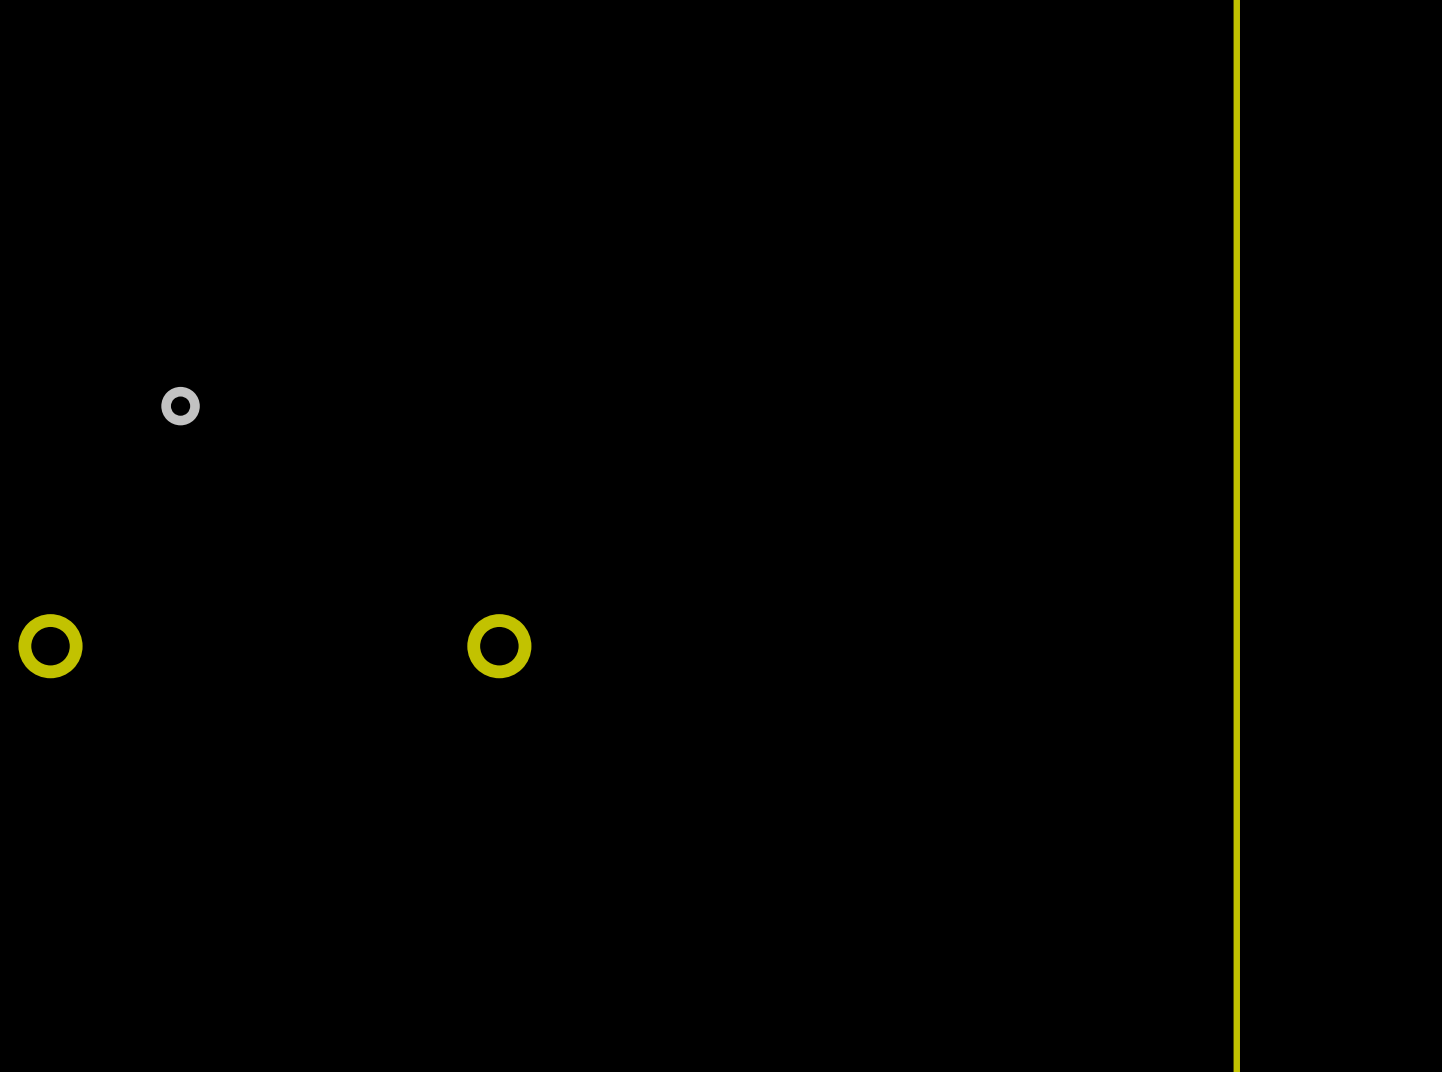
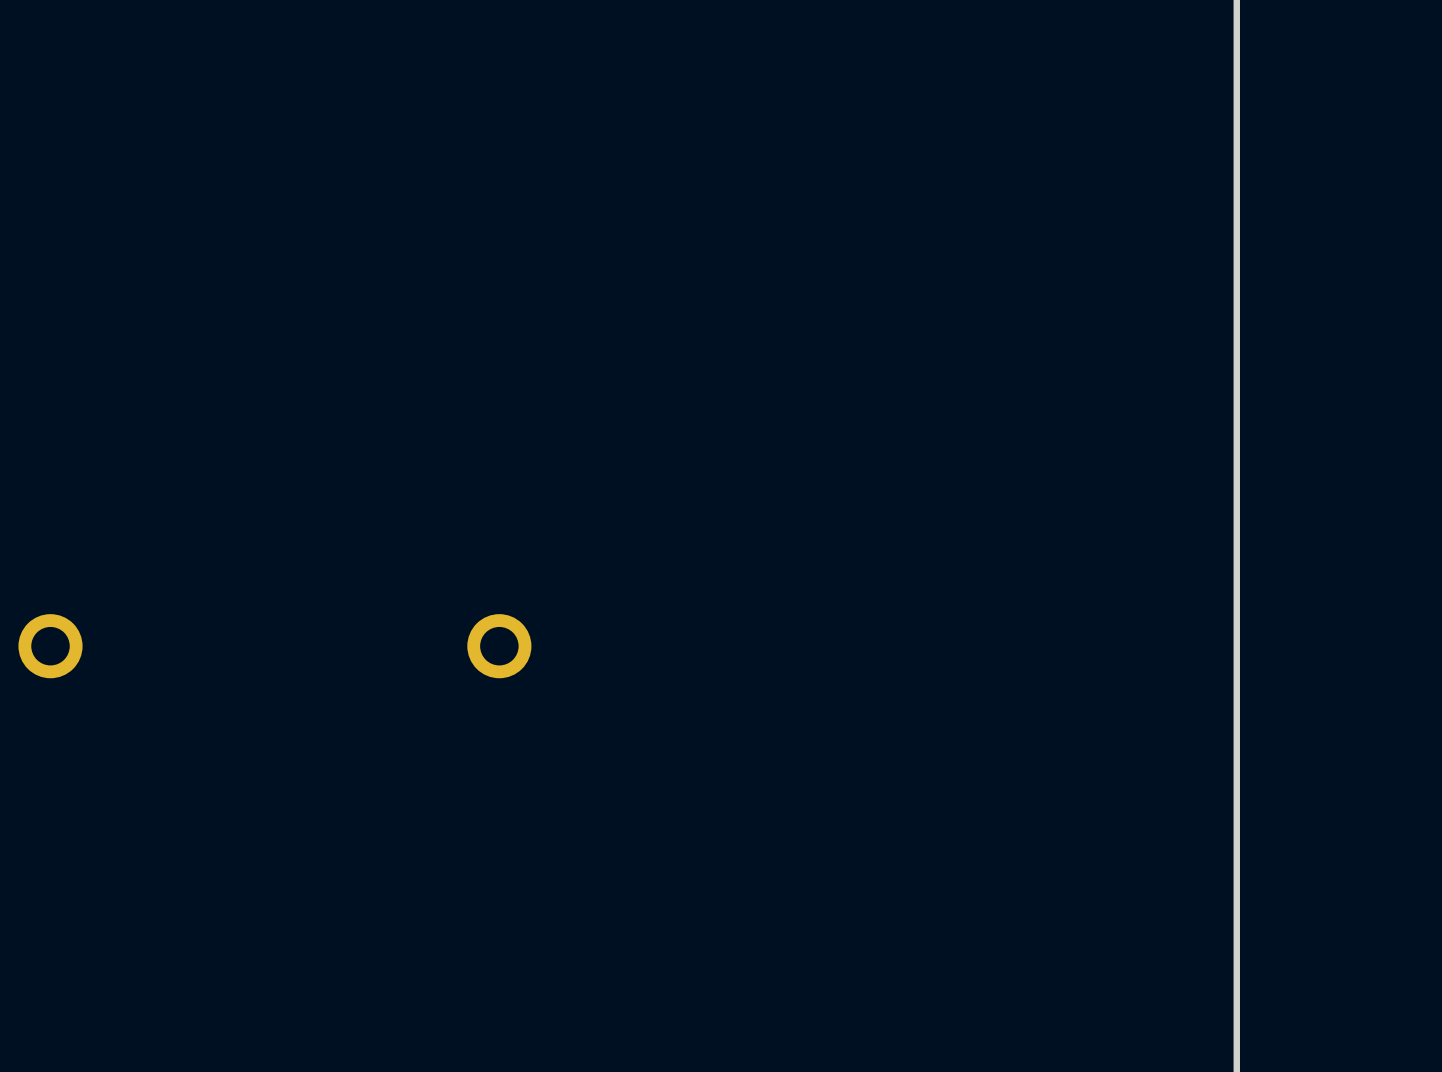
via: (180, 406) -> none

